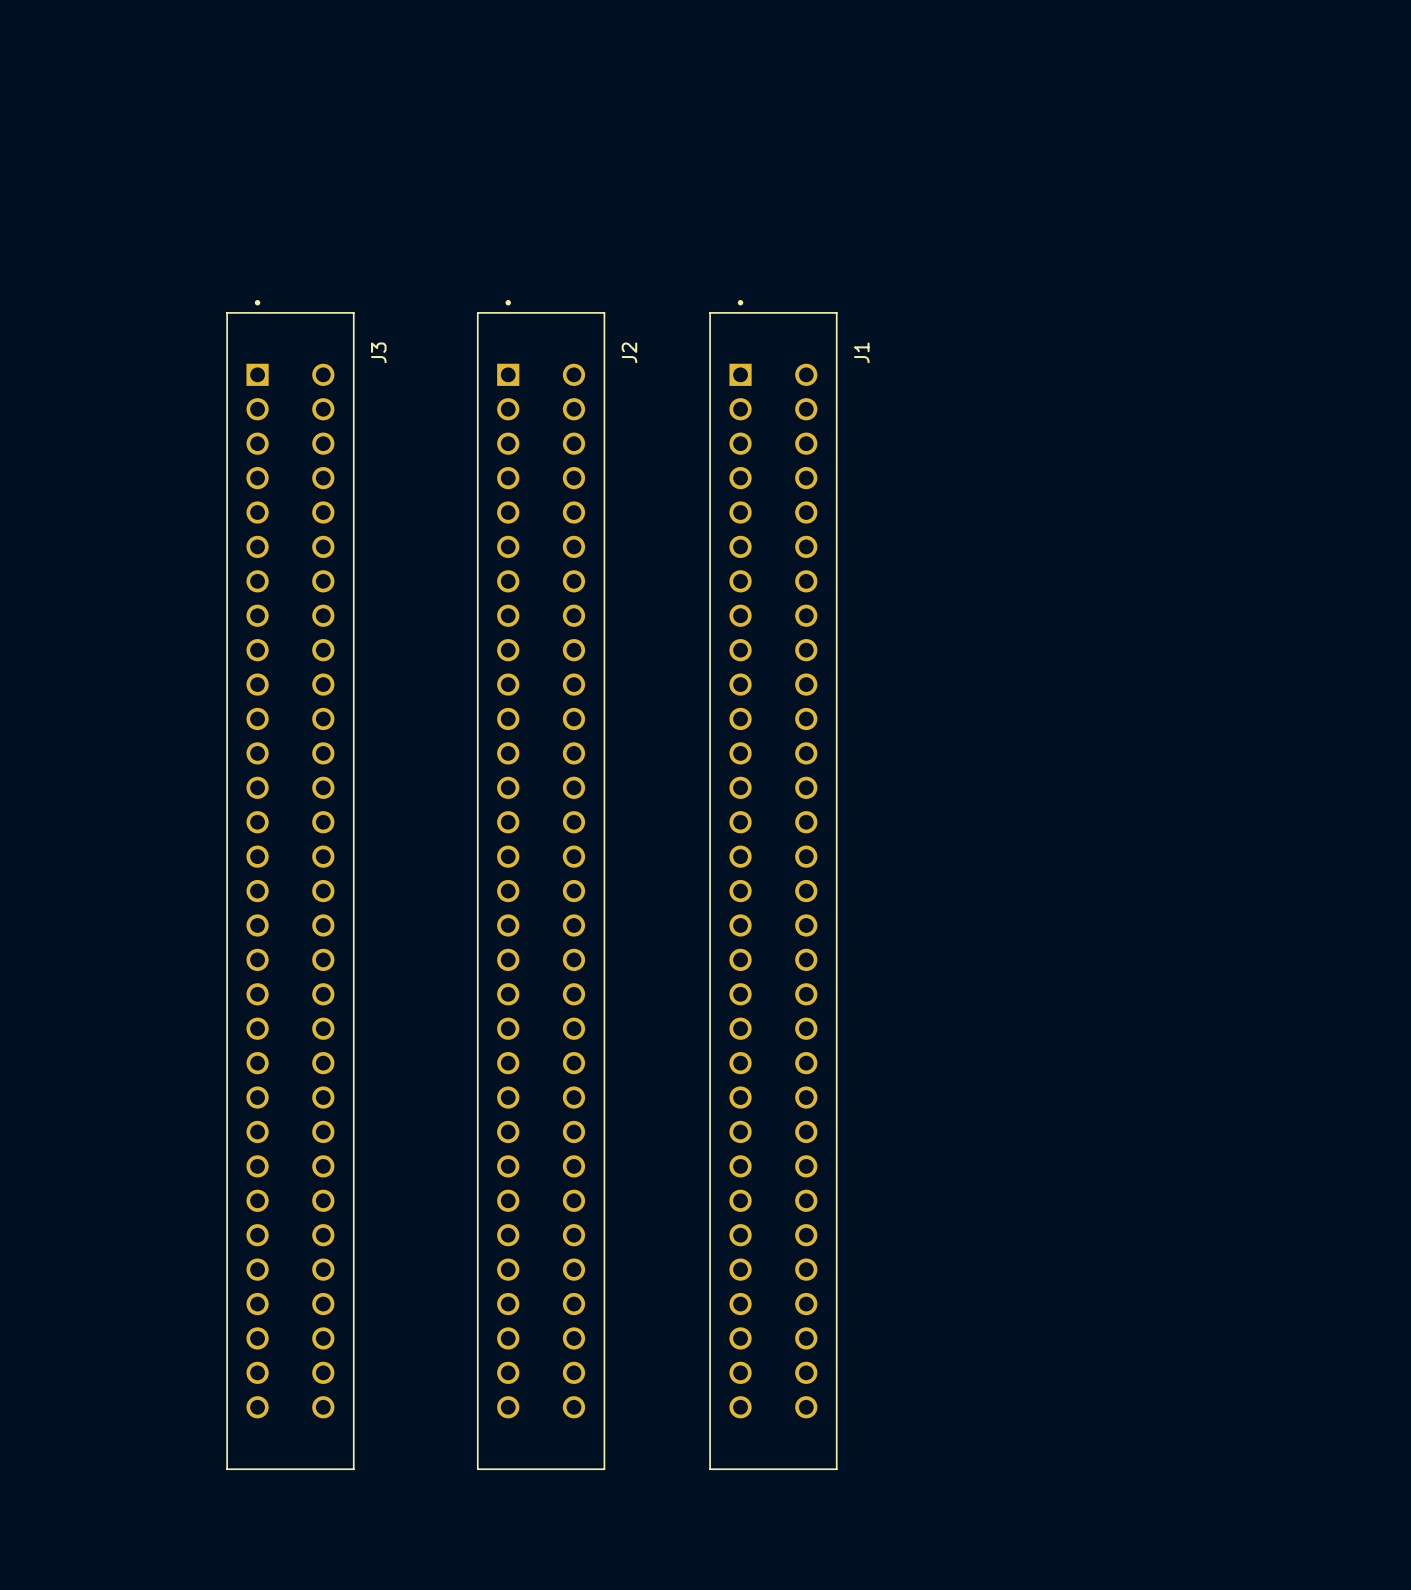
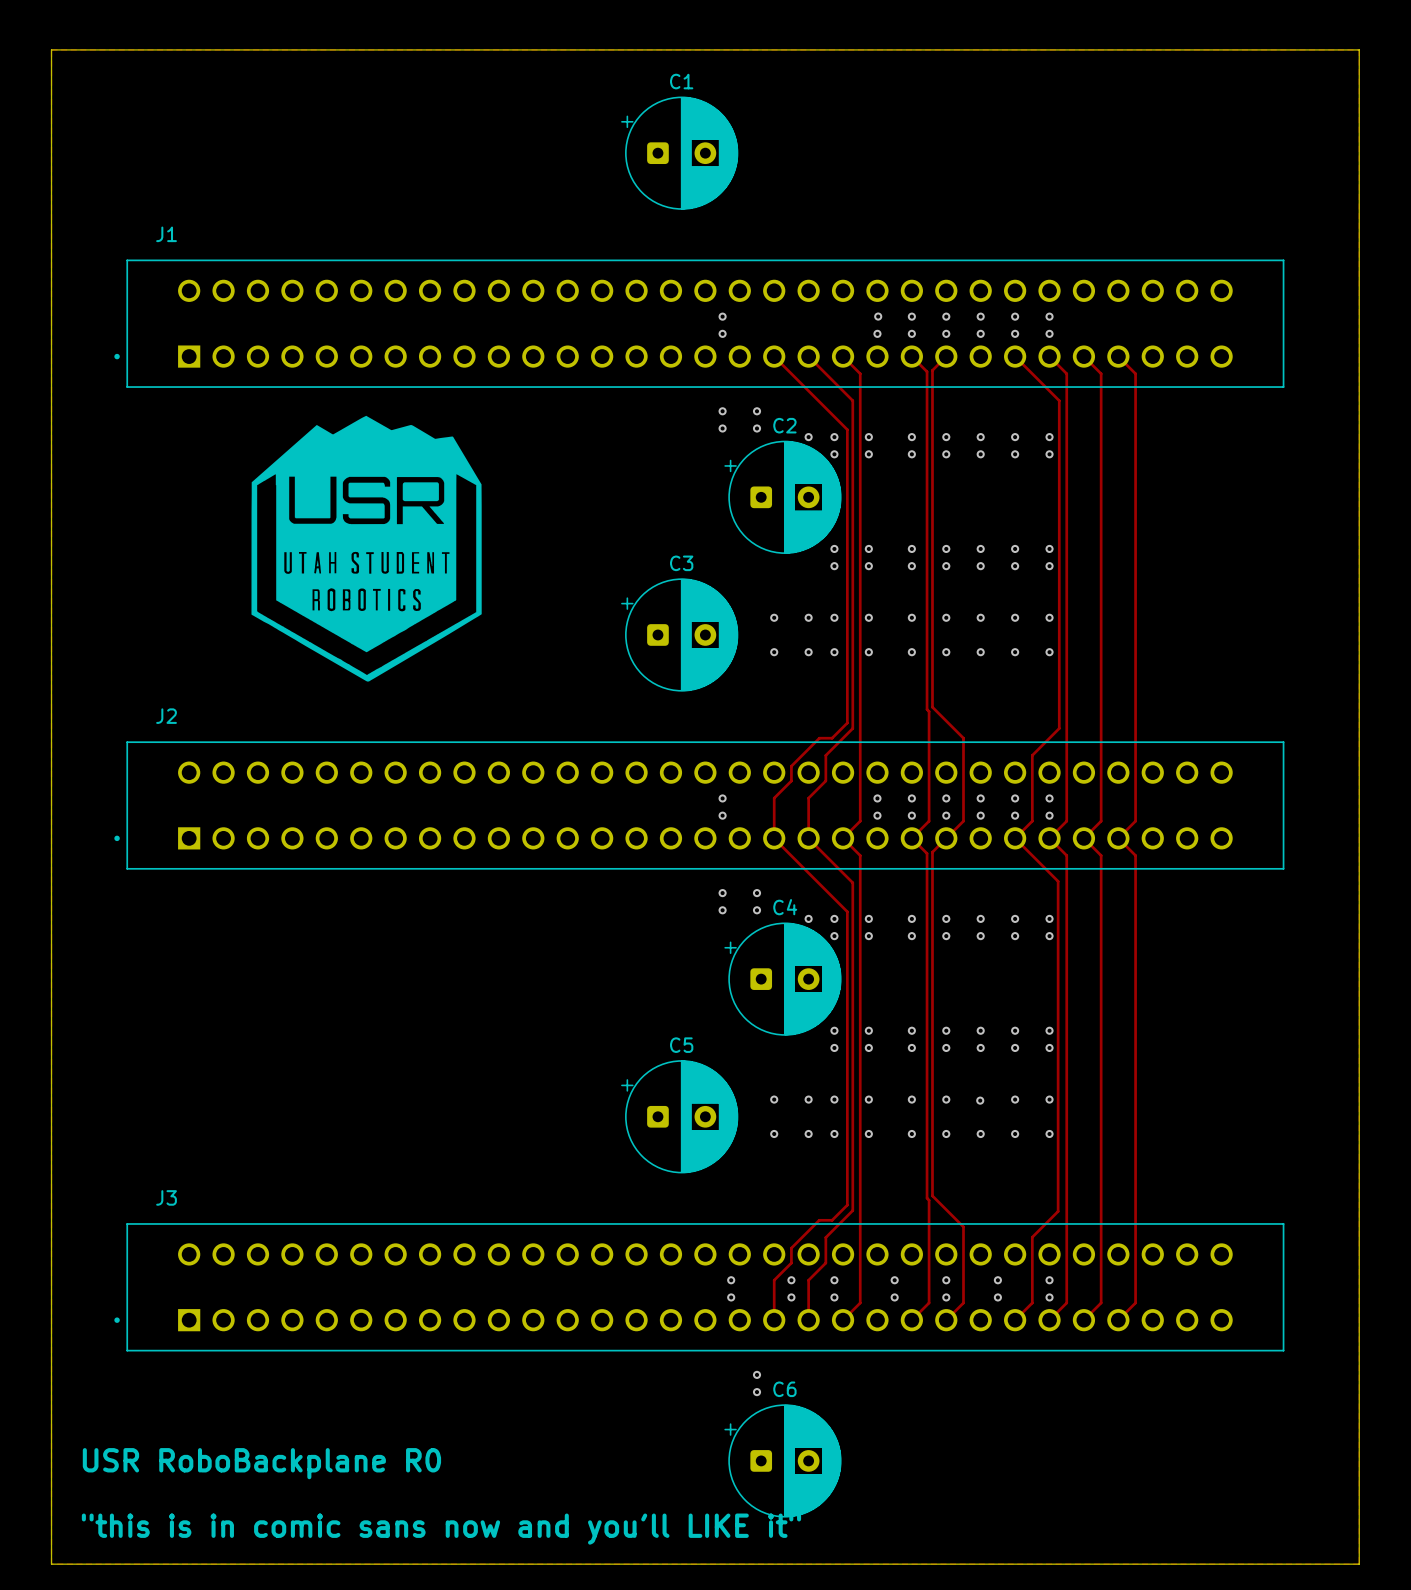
board edge: none -> (51, 49) (1359, 49) (1359, 1564) (51, 1564) (51, 49)
C1: none -> (679, 153)
via: none -> (722, 316)
via: none -> (878, 316)
via: none -> (911, 316)
via: none -> (946, 316)
via: none -> (980, 316)
via: none -> (1015, 316)
via: none -> (1049, 316)
via: none -> (722, 333)
via: none -> (877, 333)
via: none -> (911, 333)
via: none -> (946, 333)
via: none -> (980, 333)
via: none -> (1015, 333)
via: none -> (1049, 333)
track: none -> (774, 356) (847, 429) (847, 722) (832, 738) (819, 738) (791, 766) (791, 780) (774, 798) (774, 838)
track: none -> (808, 356) (852, 400) (852, 728) (825, 755) (825, 780) (808, 798) (808, 838)
track: none -> (843, 356) (860, 373) (860, 821) (843, 838) (860, 855) (860, 1302) (843, 1320)
track: none -> (911, 356) (927, 371) (927, 709) (929, 711) (929, 821) (911, 838) (927, 853) (927, 1198) (929, 1200) (929, 1302) (911, 1320)
track: none -> (946, 356) (932, 370) (932, 707) (963, 738) (963, 821) (932, 852) (932, 1195) (963, 1226) (963, 1302) (946, 1320)
track: none -> (1015, 356) (1059, 400) (1059, 728) (1032, 755) (1032, 821) (1015, 838) (1058, 881) (1058, 1211) (1032, 1237) (1032, 1302) (1015, 1320)
track: none -> (1049, 356) (1066, 373) (1066, 821) (1049, 838) (1066, 855) (1066, 1302) (1049, 1320)
track: none -> (1083, 356) (1101, 373) (1101, 821) (1083, 838) (1101, 855) (1101, 1302) (1083, 1320)
track: none -> (1118, 356) (1135, 373) (1135, 821) (1118, 838) (1135, 855) (1135, 1302) (1118, 1320)
via: none -> (722, 411)
via: none -> (757, 411)
drawing: none -> [251, 415, 482, 682]
via: none -> (722, 428)
via: none -> (757, 428)
via: none -> (808, 437)
via: none -> (834, 437)
via: none -> (868, 437)
via: none -> (911, 437)
via: none -> (946, 437)
via: none -> (980, 437)
via: none -> (1015, 437)
via: none -> (1049, 437)
via: none -> (834, 454)
via: none -> (868, 454)
via: none -> (911, 454)
via: none -> (946, 454)
via: none -> (980, 454)
via: none -> (1015, 454)
via: none -> (1049, 454)
C2: none -> (782, 497)
via: none -> (834, 548)
via: none -> (868, 548)
via: none -> (911, 548)
via: none -> (946, 548)
via: none -> (980, 548)
via: none -> (1015, 548)
via: none -> (1049, 548)
via: none -> (834, 566)
via: none -> (868, 566)
via: none -> (911, 566)
via: none -> (946, 566)
via: none -> (980, 566)
via: none -> (1015, 566)
via: none -> (1049, 566)
via: none -> (774, 617)
via: none -> (808, 617)
via: none -> (834, 617)
via: none -> (868, 617)
via: none -> (911, 617)
via: none -> (946, 617)
via: none -> (980, 617)
via: none -> (1015, 617)
via: none -> (1049, 617)
C3: none -> (679, 634)
via: none -> (774, 652)
via: none -> (808, 652)
via: none -> (834, 652)
via: none -> (868, 652)
via: none -> (911, 652)
via: none -> (946, 652)
via: none -> (980, 652)
via: none -> (1015, 652)
via: none -> (1049, 652)
via: none -> (722, 798)
via: none -> (877, 798)
via: none -> (911, 798)
via: none -> (946, 798)
via: none -> (980, 798)
via: none -> (1015, 798)
via: none -> (1049, 798)
via: none -> (722, 815)
via: none -> (877, 815)
via: none -> (911, 815)
via: none -> (946, 815)
via: none -> (980, 815)
via: none -> (1015, 815)
via: none -> (1049, 815)
track: none -> (774, 838) (847, 911) (847, 1205) (832, 1220) (819, 1220) (791, 1248) (791, 1263) (774, 1280) (774, 1320)
track: none -> (808, 838) (852, 882) (852, 1210) (825, 1237) (825, 1263) (808, 1280) (808, 1320)
J3 rotation: 0° (290, 885) -> 90° counterclockwise (699, 1287)
J2 rotation: 0° (541, 885) -> 90° counterclockwise (699, 805)
J1 rotation: 0° (773, 885) -> 90° counterclockwise (699, 323)
via: none -> (722, 893)
via: none -> (757, 893)
via: none -> (722, 910)
via: none -> (757, 910)
via: none -> (808, 918)
via: none -> (834, 918)
via: none -> (868, 918)
via: none -> (911, 918)
via: none -> (946, 918)
via: none -> (980, 918)
via: none -> (1015, 918)
via: none -> (1049, 918)
via: none -> (834, 936)
via: none -> (868, 936)
via: none -> (911, 936)
via: none -> (946, 936)
via: none -> (980, 936)
via: none -> (1015, 936)
via: none -> (1049, 936)
C4: none -> (782, 979)
via: none -> (834, 1030)
via: none -> (868, 1030)
via: none -> (911, 1030)
via: none -> (946, 1030)
via: none -> (980, 1030)
via: none -> (1015, 1030)
via: none -> (1049, 1030)
via: none -> (834, 1047)
via: none -> (868, 1047)
via: none -> (911, 1047)
via: none -> (946, 1047)
via: none -> (980, 1047)
via: none -> (1015, 1047)
via: none -> (1049, 1047)
via: none -> (774, 1099)
via: none -> (808, 1099)
via: none -> (834, 1099)
via: none -> (868, 1099)
via: none -> (911, 1099)
via: none -> (946, 1099)
via: none -> (1015, 1099)
via: none -> (1049, 1099)
via: none -> (980, 1100)
C5: none -> (679, 1116)
via: none -> (774, 1133)
via: none -> (808, 1133)
via: none -> (834, 1133)
via: none -> (868, 1133)
via: none -> (911, 1133)
via: none -> (946, 1133)
via: none -> (980, 1133)
via: none -> (1015, 1133)
via: none -> (1049, 1133)
via: none -> (731, 1280)
via: none -> (791, 1280)
via: none -> (834, 1280)
via: none -> (894, 1280)
via: none -> (946, 1280)
via: none -> (997, 1280)
via: none -> (1049, 1280)
via: none -> (731, 1297)
via: none -> (791, 1297)
via: none -> (834, 1297)
via: none -> (894, 1297)
via: none -> (946, 1297)
via: none -> (997, 1297)
via: none -> (1049, 1297)
via: none -> (757, 1374)
via: none -> (757, 1392)
C6: none -> (782, 1460)
text: none -> USR RoboBackplane R0 (261, 1463)
text: none -> "this is in comic sans now and you'll LIKE it" (441, 1529)

